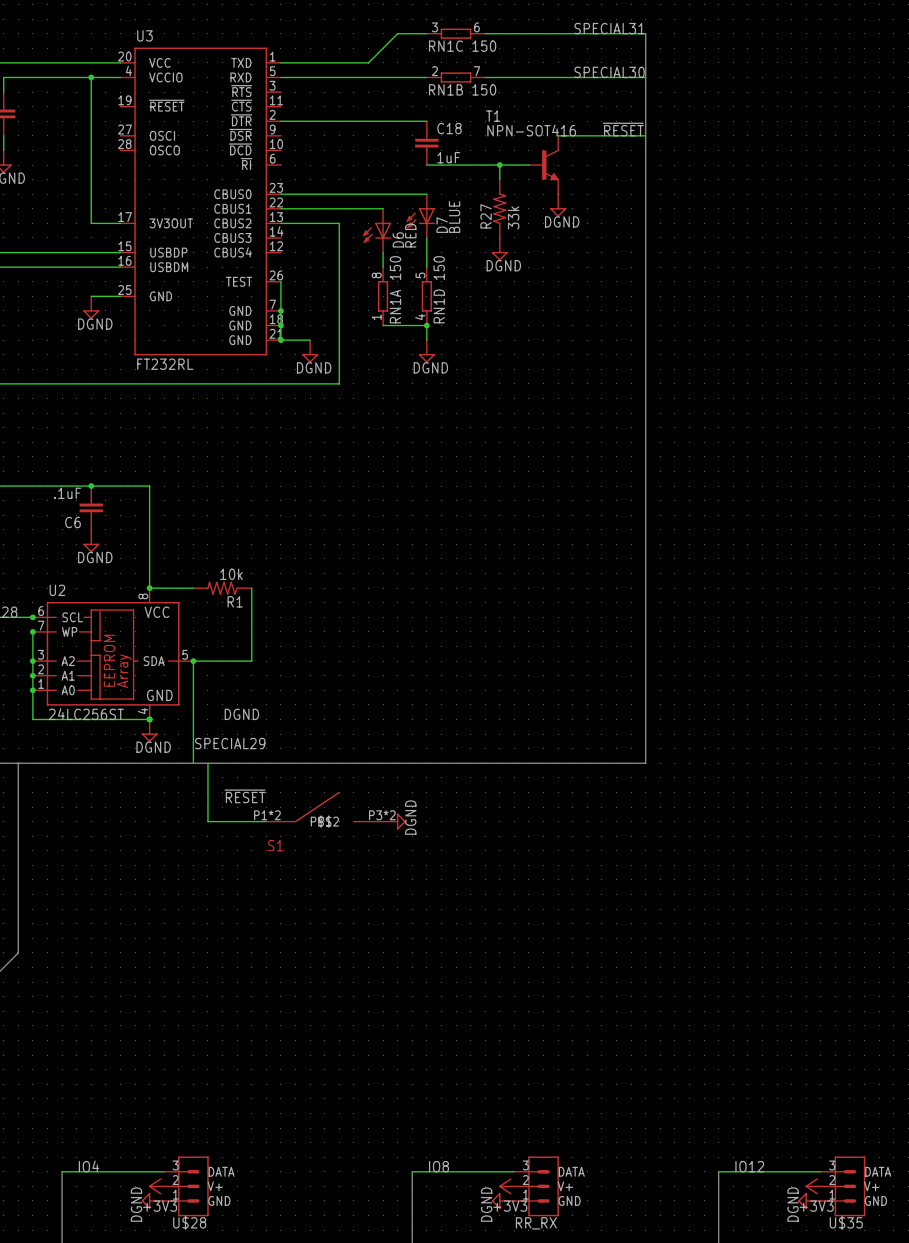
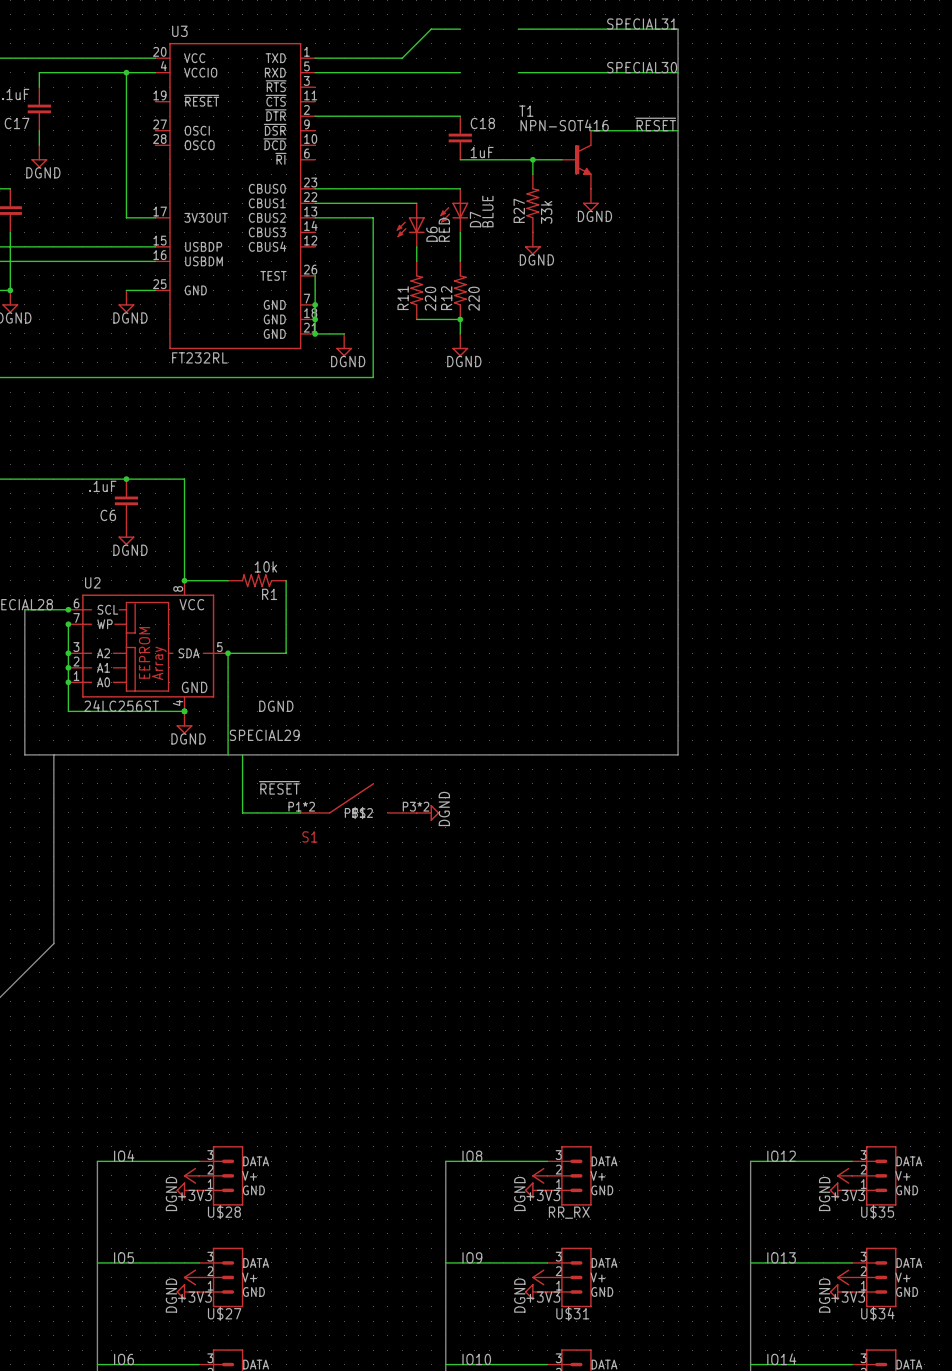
RN1C: 150 (456, 33) -> none
RN1B: 150 (456, 77) -> none
RN1A: 150 (383, 296) -> none
R11: none -> 220 (416, 290)
RN1D: 150 (426, 296) -> none
R12: none -> 220 (460, 290)

